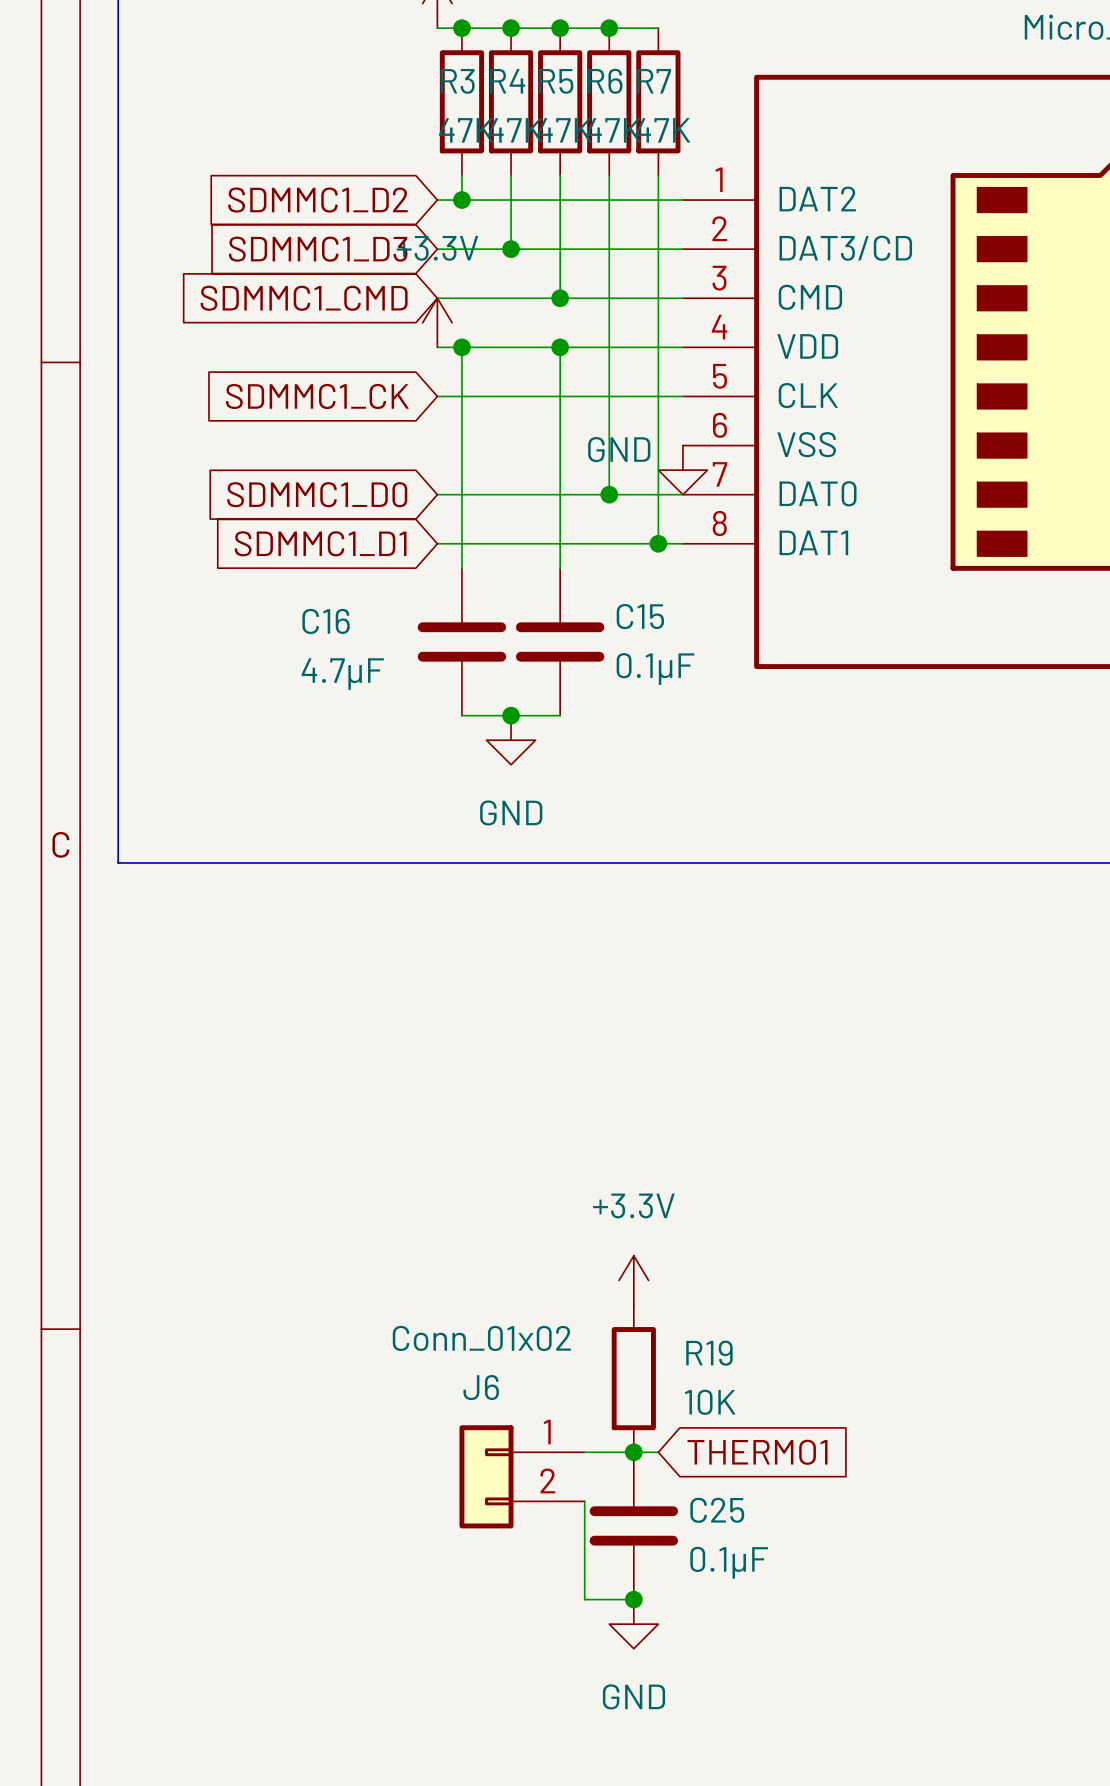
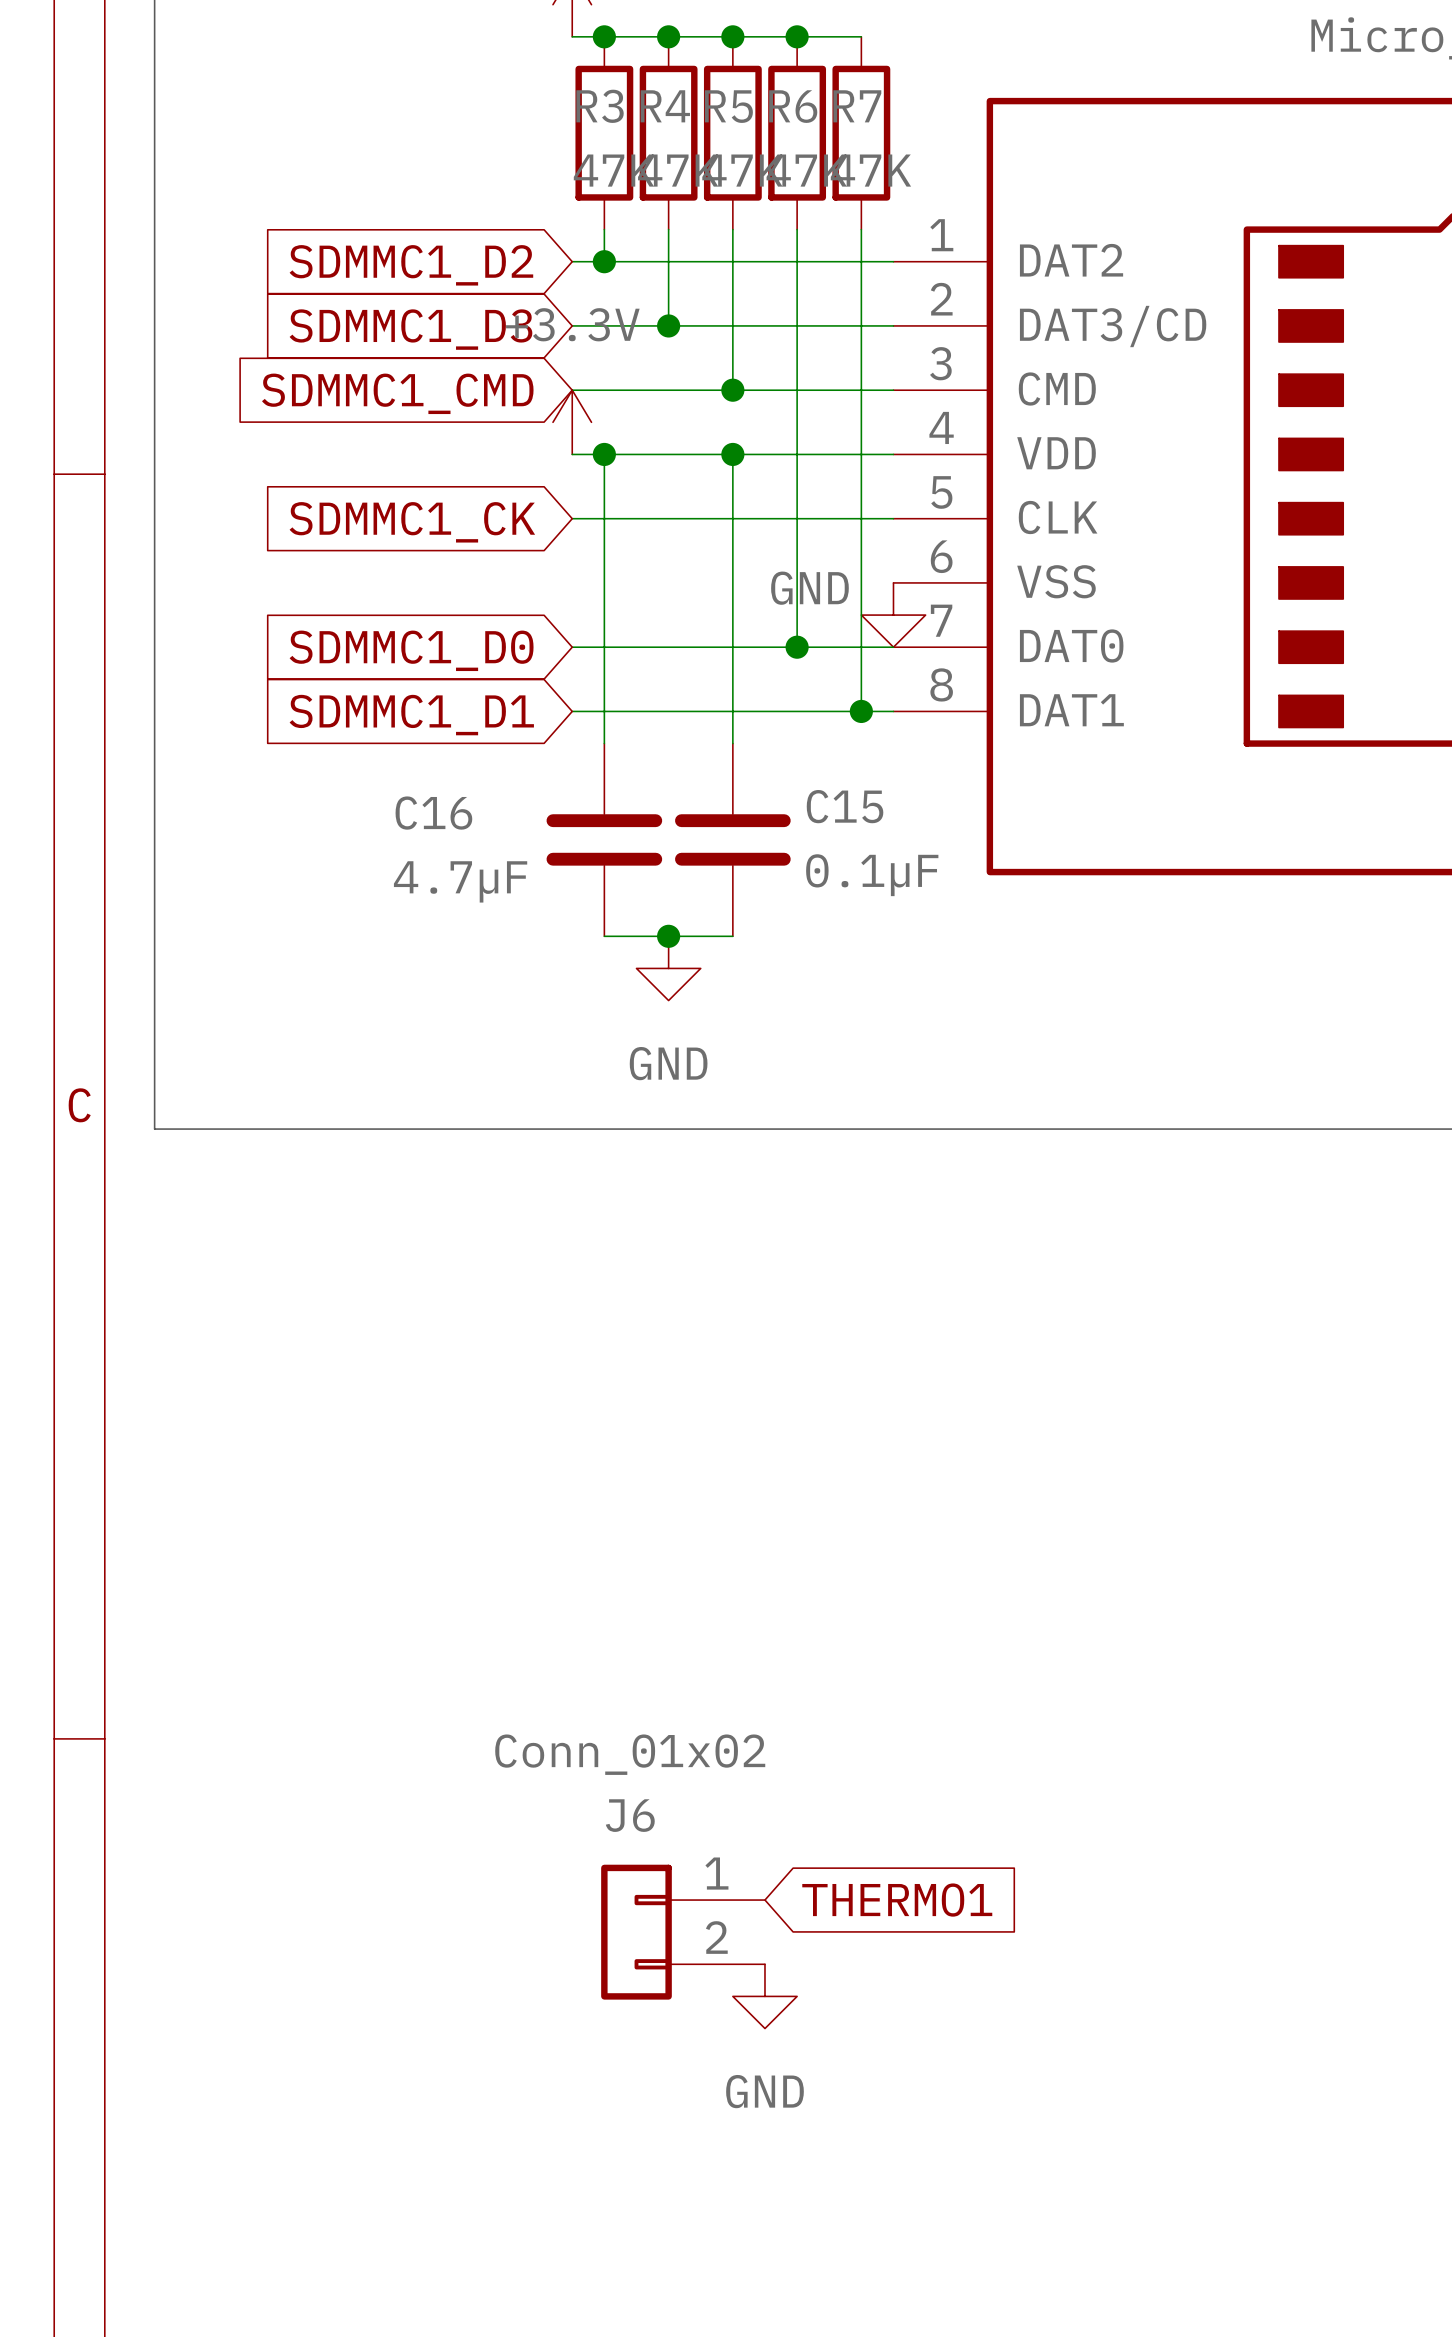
power symbol: +3.3V (633, 1280) -> none
R19: 10K (633, 1378) -> none
wire: (584, 1452) (658, 1452) -> none
junction: (633, 1452) -> none
global label position: THERMO1 (757, 1452) -> THERMO1 (897, 1900)
wire: (584, 1501) (584, 1599) (633, 1599) -> none
C25: 0.1µF (633, 1525) -> none
junction: (633, 1599) -> none
power symbol position: GND (633, 1624) -> GND (764, 1996)

